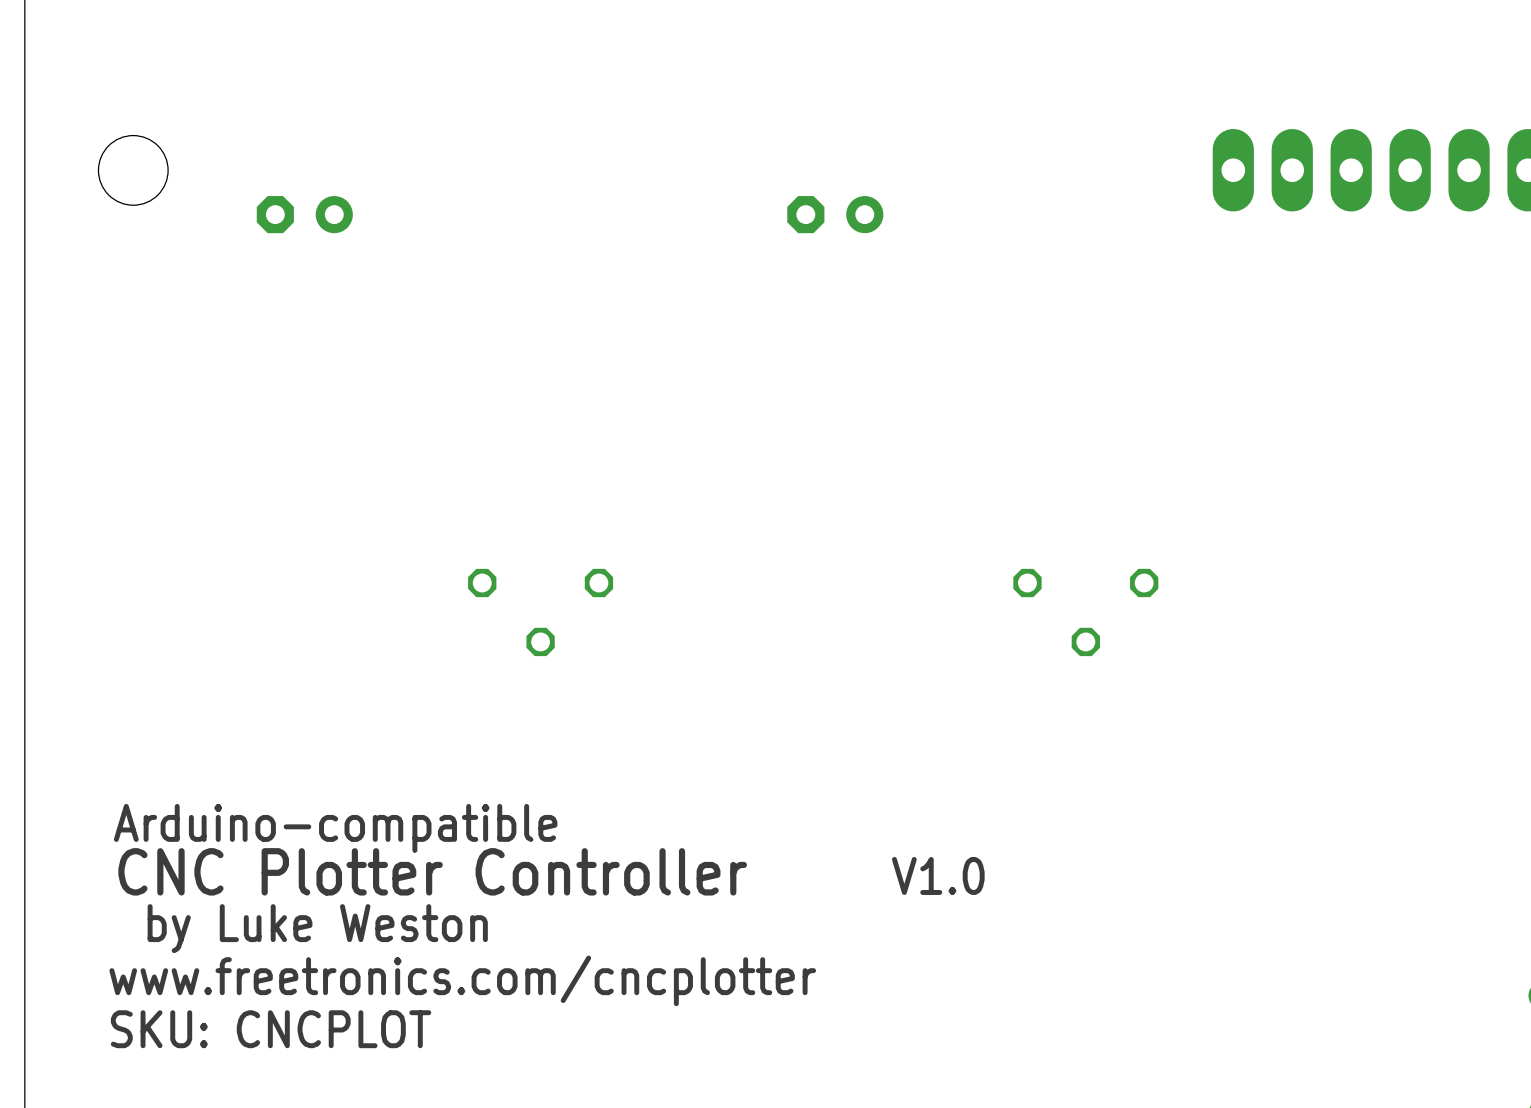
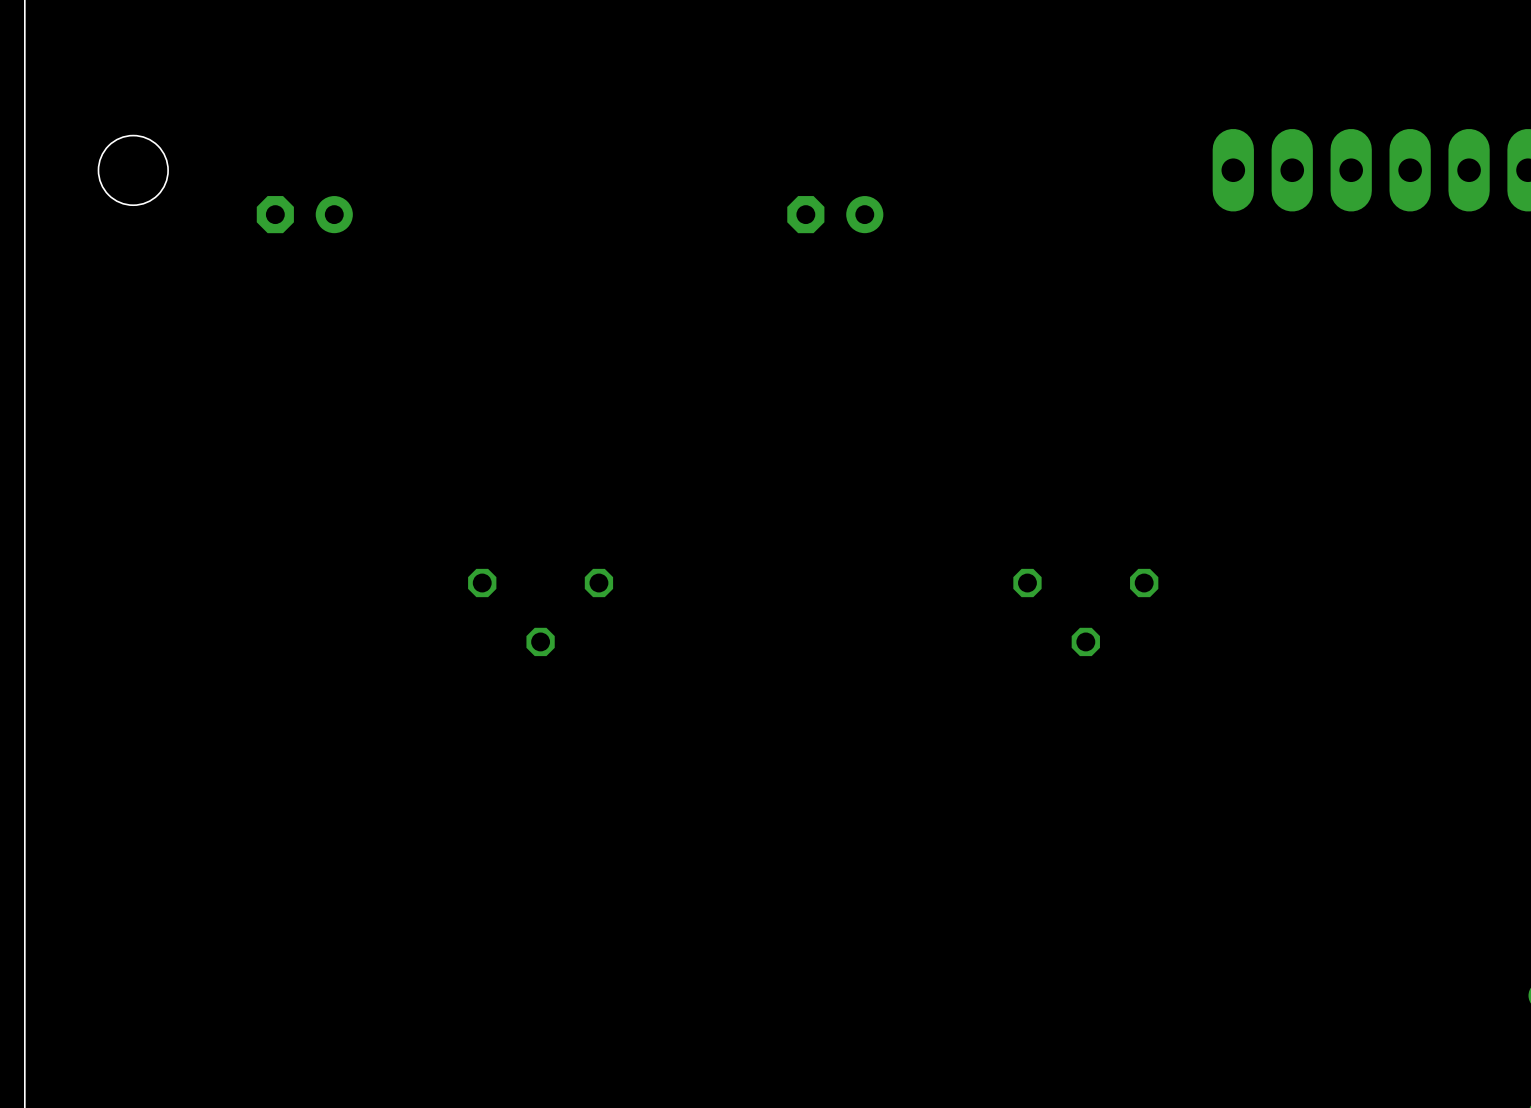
text: Arduino-compatible (335, 828) -> none
text: CNC Plotter Controller (432, 871) -> none
text: V1.0 (938, 875) -> none
text: by Luke Weston (317, 928) -> none
text: www.freetronics.com/cncplotter (462, 980) -> none
text: SKU: CNCPLOT (271, 1029) -> none

